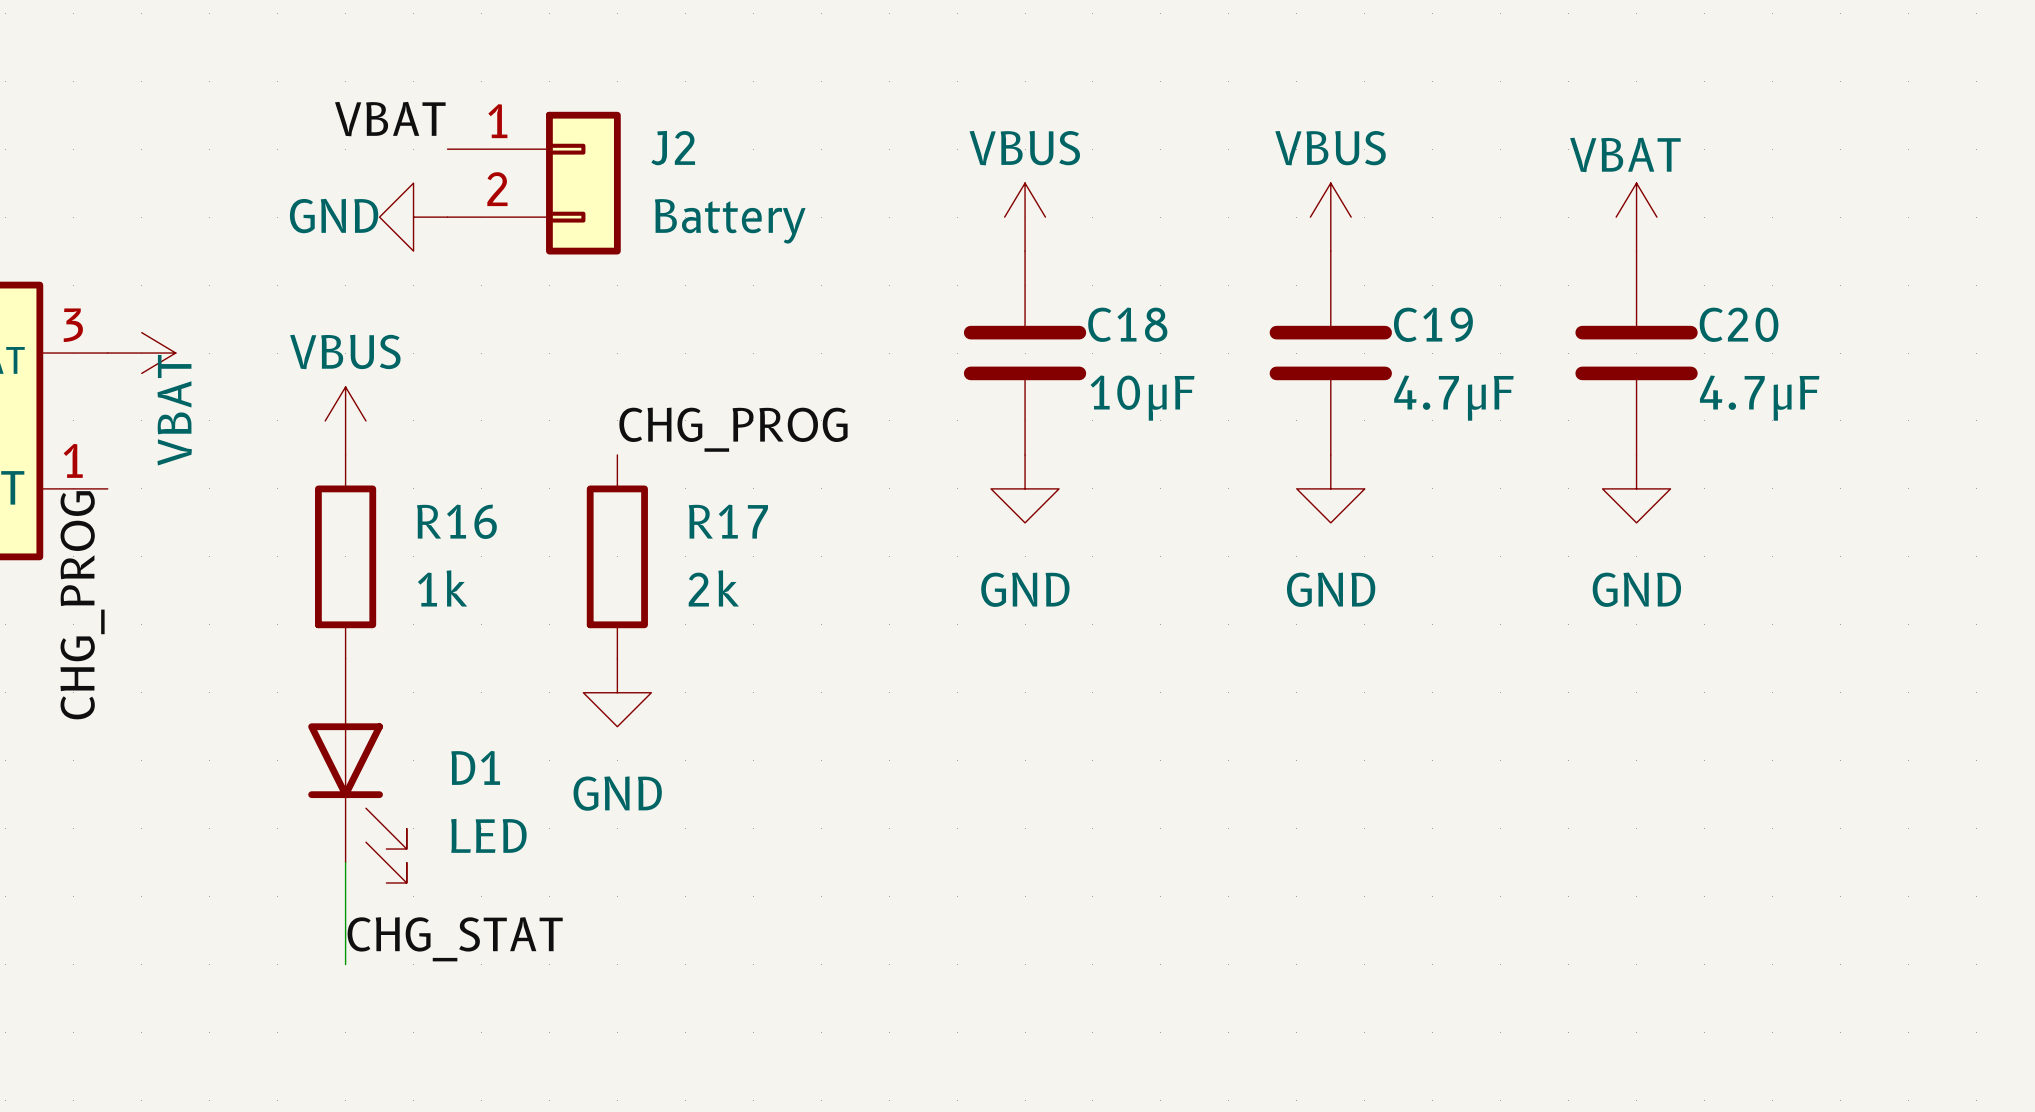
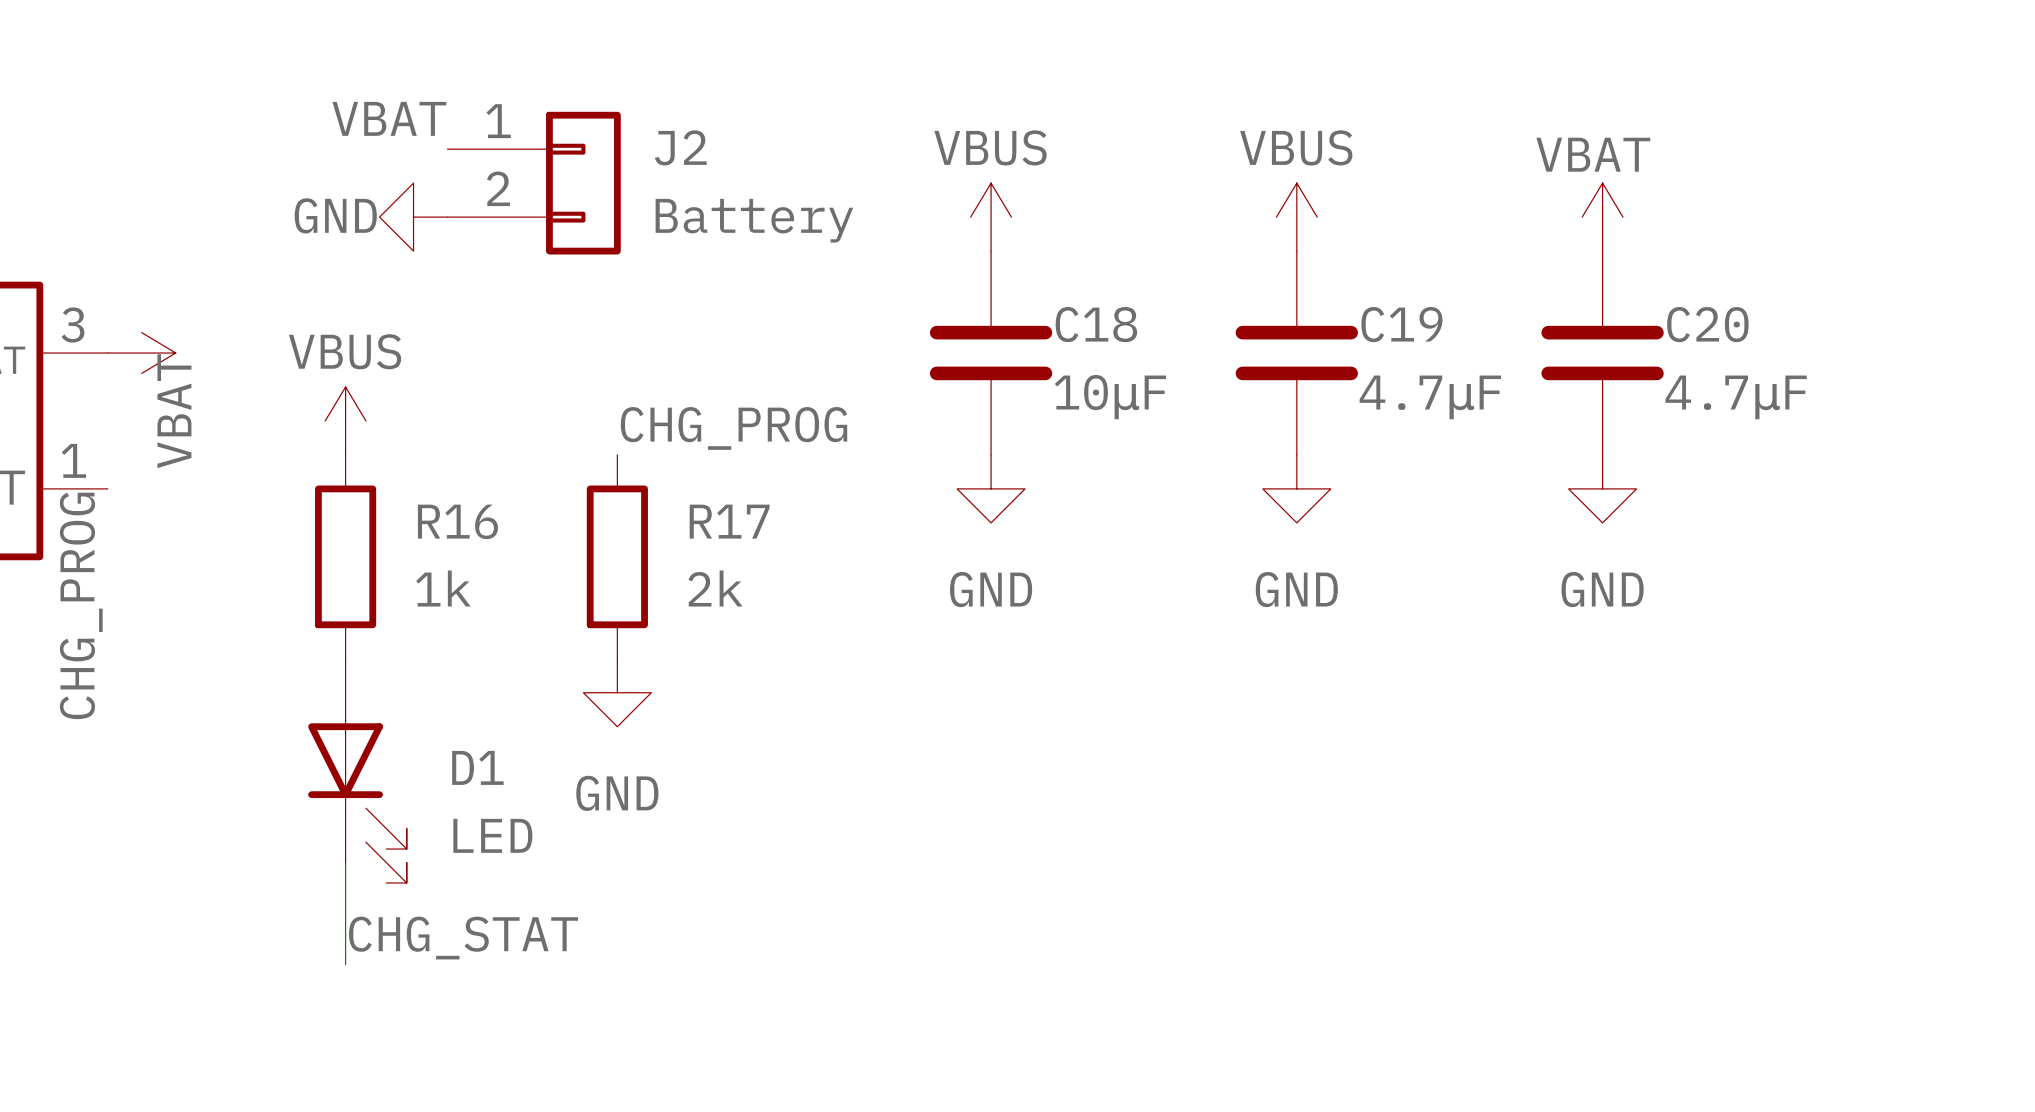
power symbol position: VBUS (1025, 217) -> VBUS (991, 217)
power symbol position: VBUS (1330, 217) -> VBUS (1296, 217)
power symbol position: VBAT (1636, 217) -> VBAT (1602, 217)
C18 position: (1025, 353) -> (991, 353)
C19 position: (1330, 353) -> (1296, 353)
C20 position: (1636, 353) -> (1602, 353)
power symbol position: GND (1025, 488) -> GND (991, 488)
power symbol position: GND (1330, 488) -> GND (1296, 488)
power symbol position: GND (1636, 488) -> GND (1602, 488)

